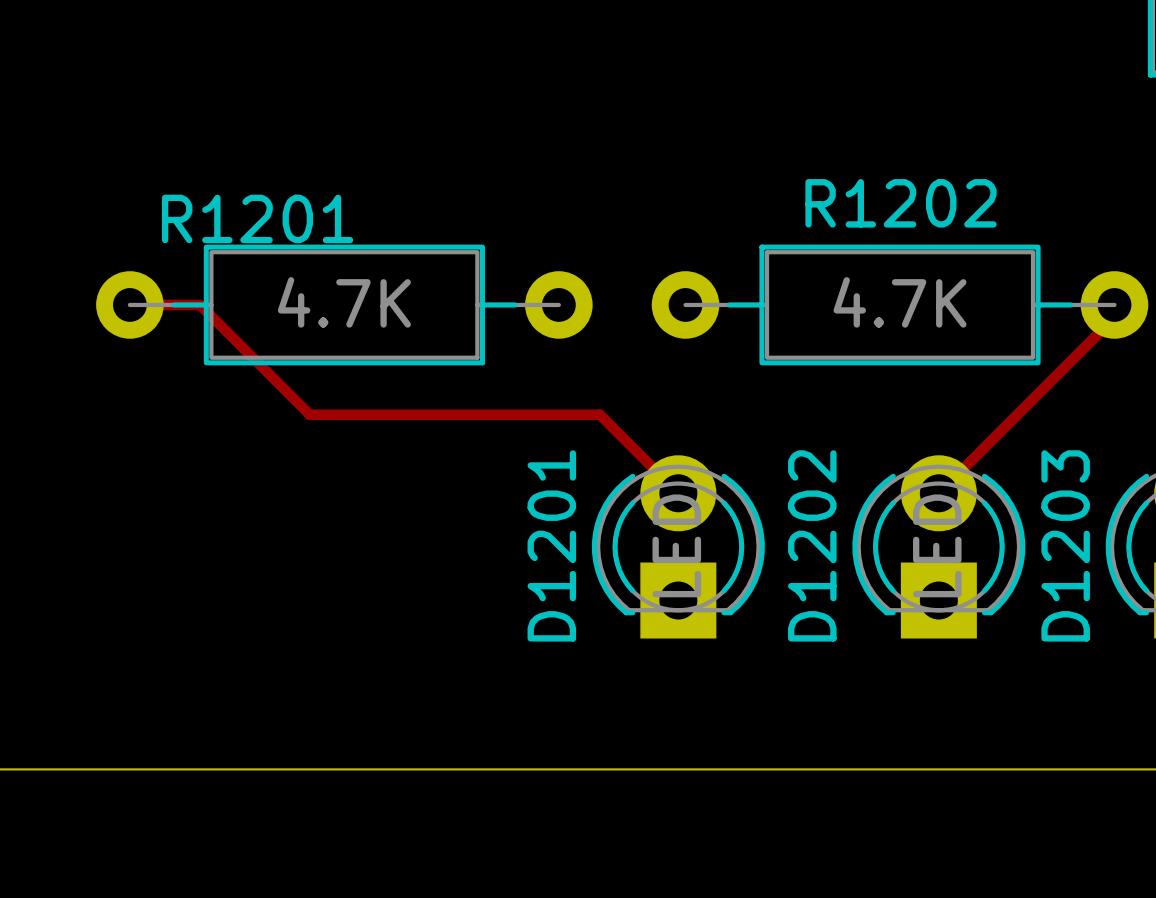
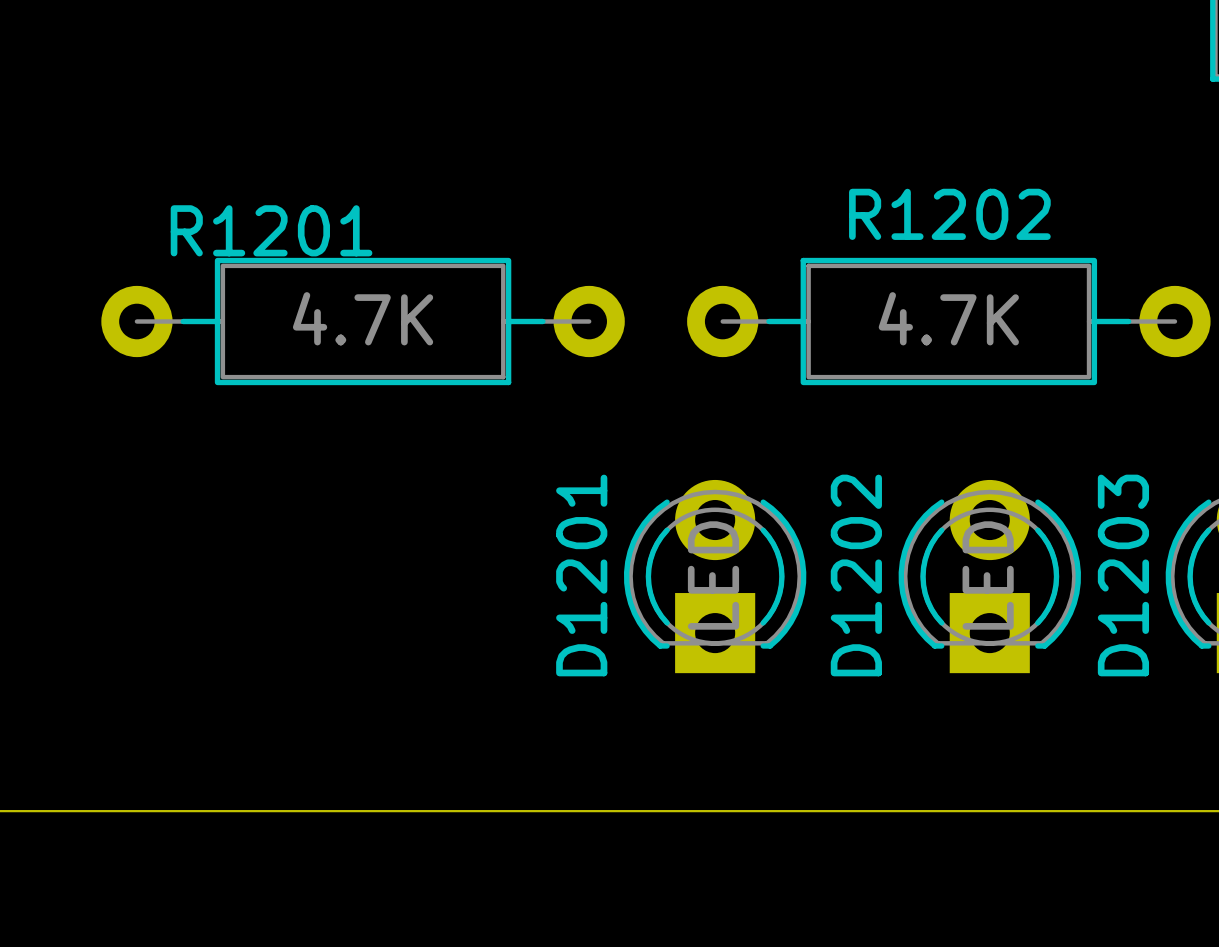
top track: (129, 304) (199, 304) (309, 414) (599, 414) (678, 493) -> none
top track: (1114, 304) (1114, 317) (938, 493) -> none

